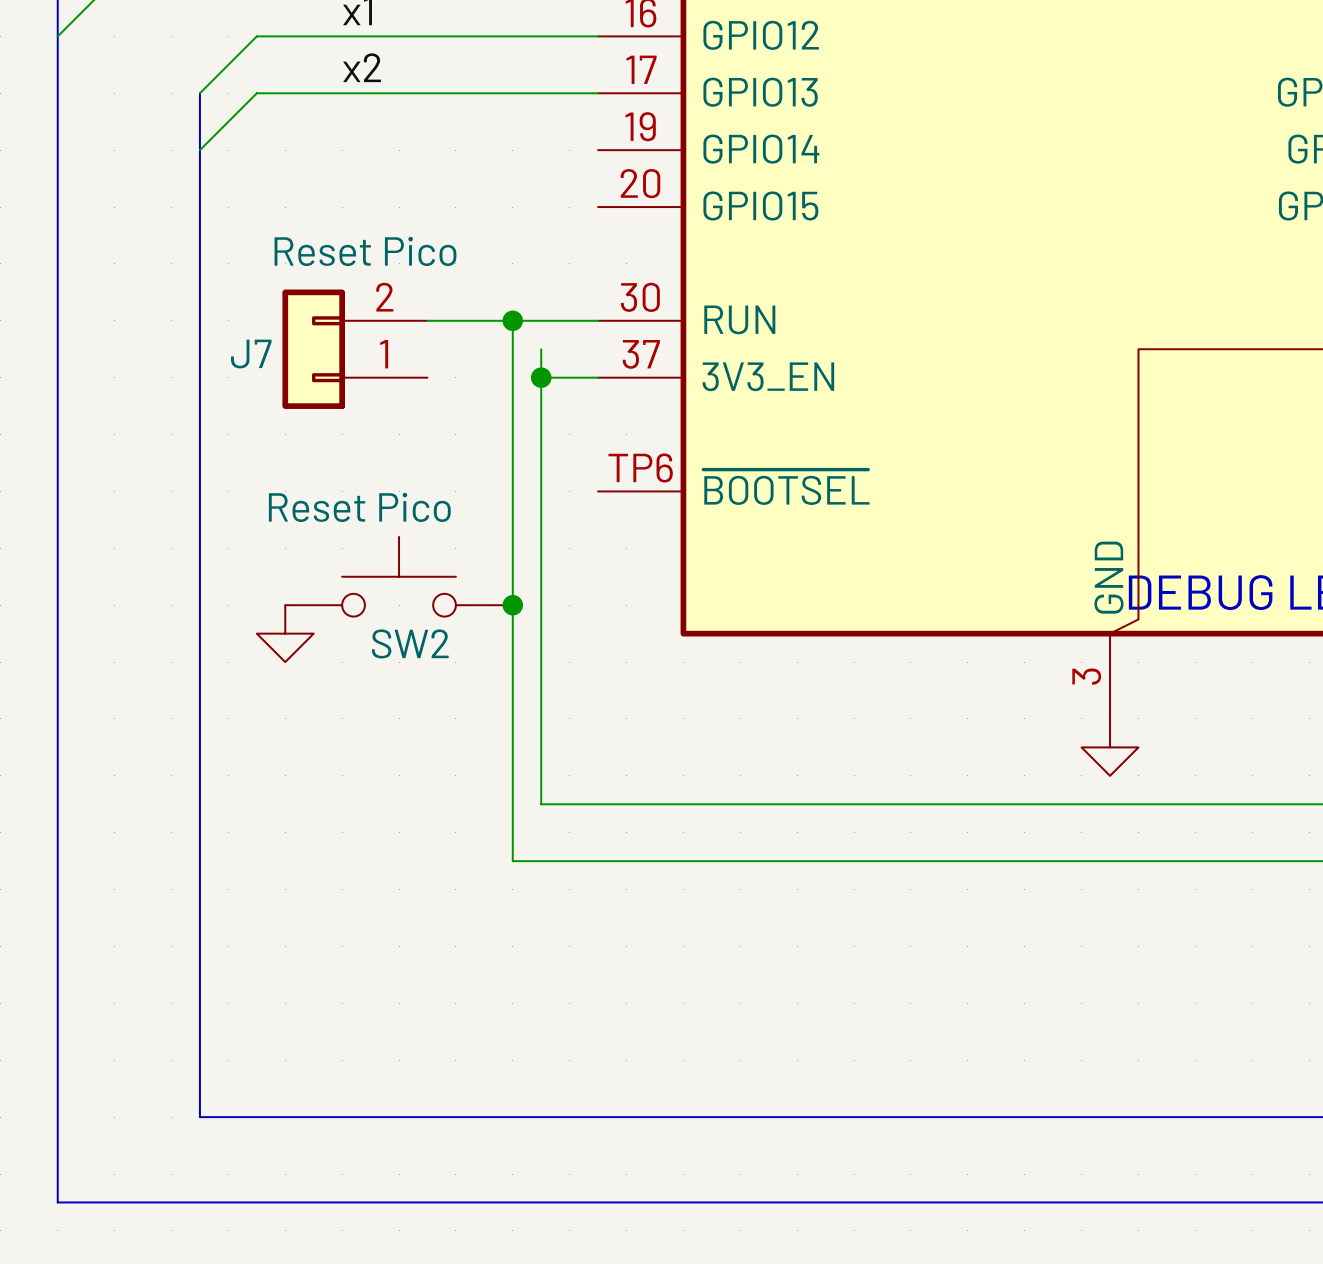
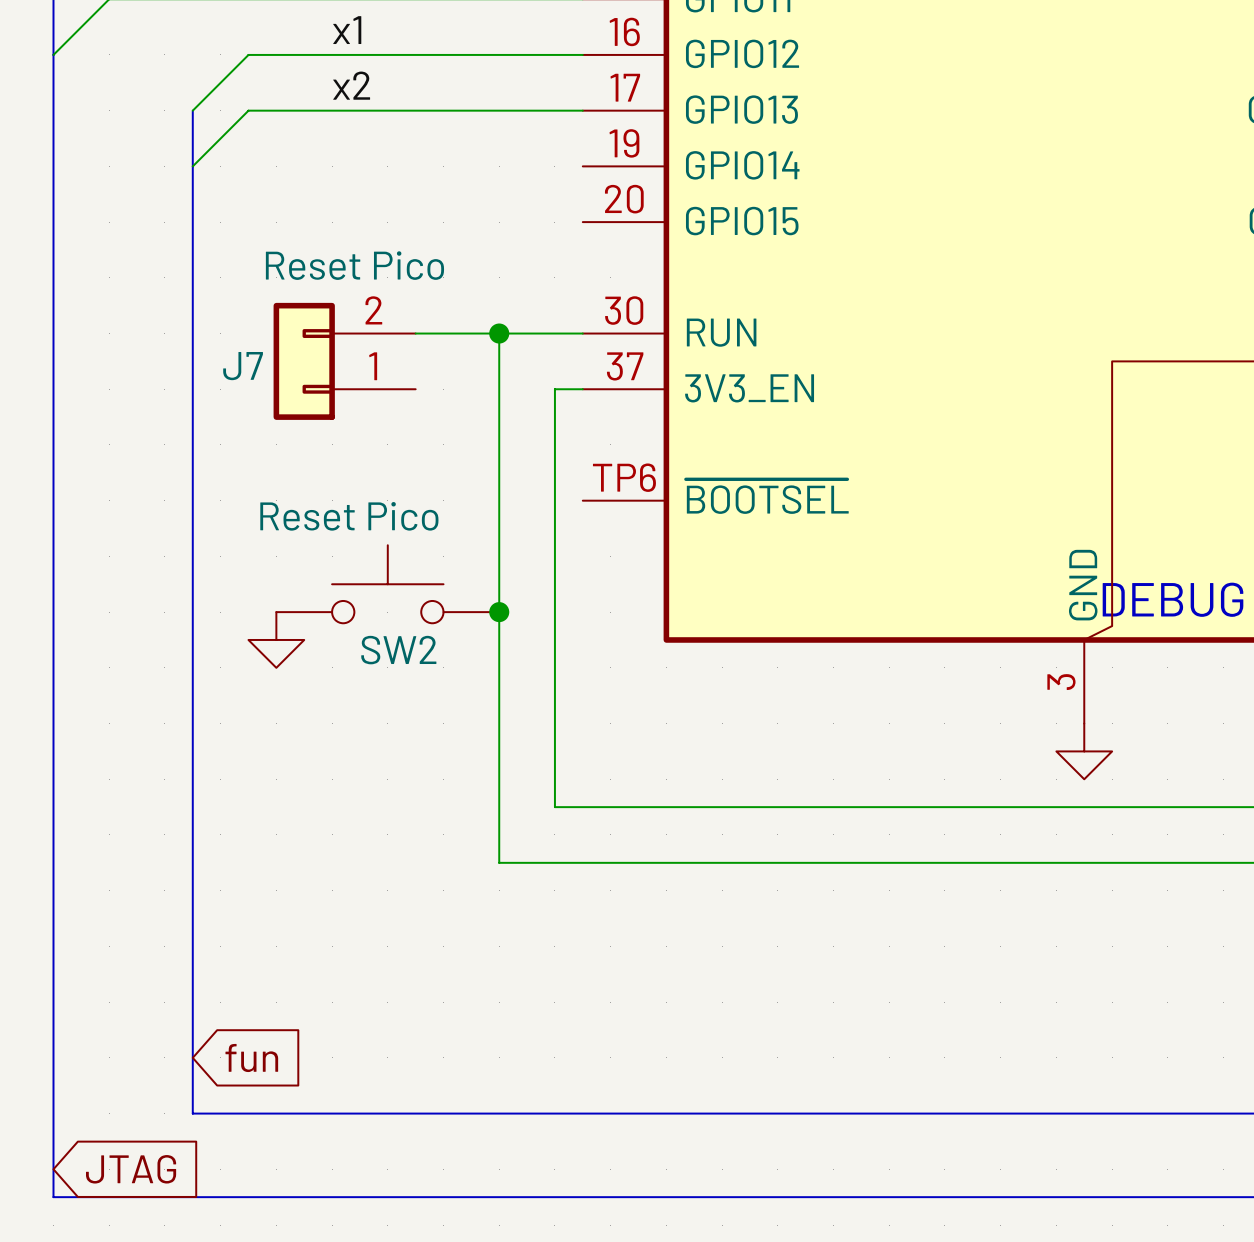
wire: (541, 349) (541, 804) (569, 804) -> (554, 389) (554, 807)
wire: (541, 377) (569, 377) -> none
junction: (541, 377) -> none
global label: none -> fun (251, 1057)
global label: none -> JTAG (131, 1169)

